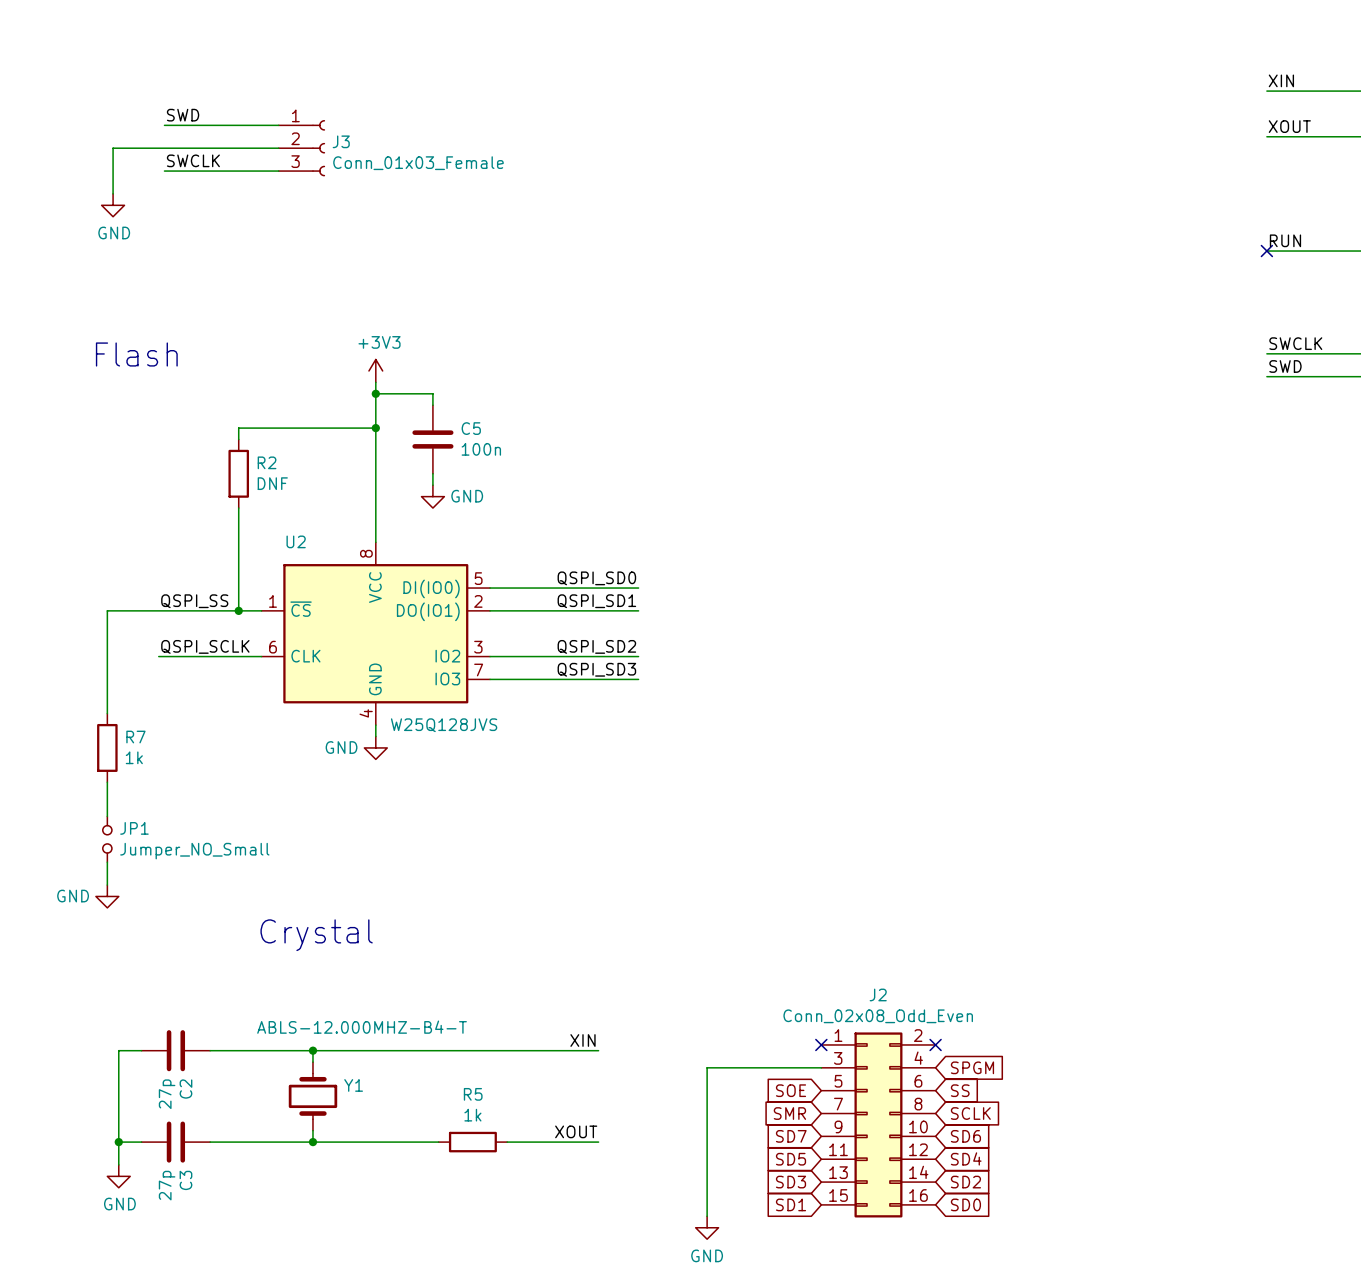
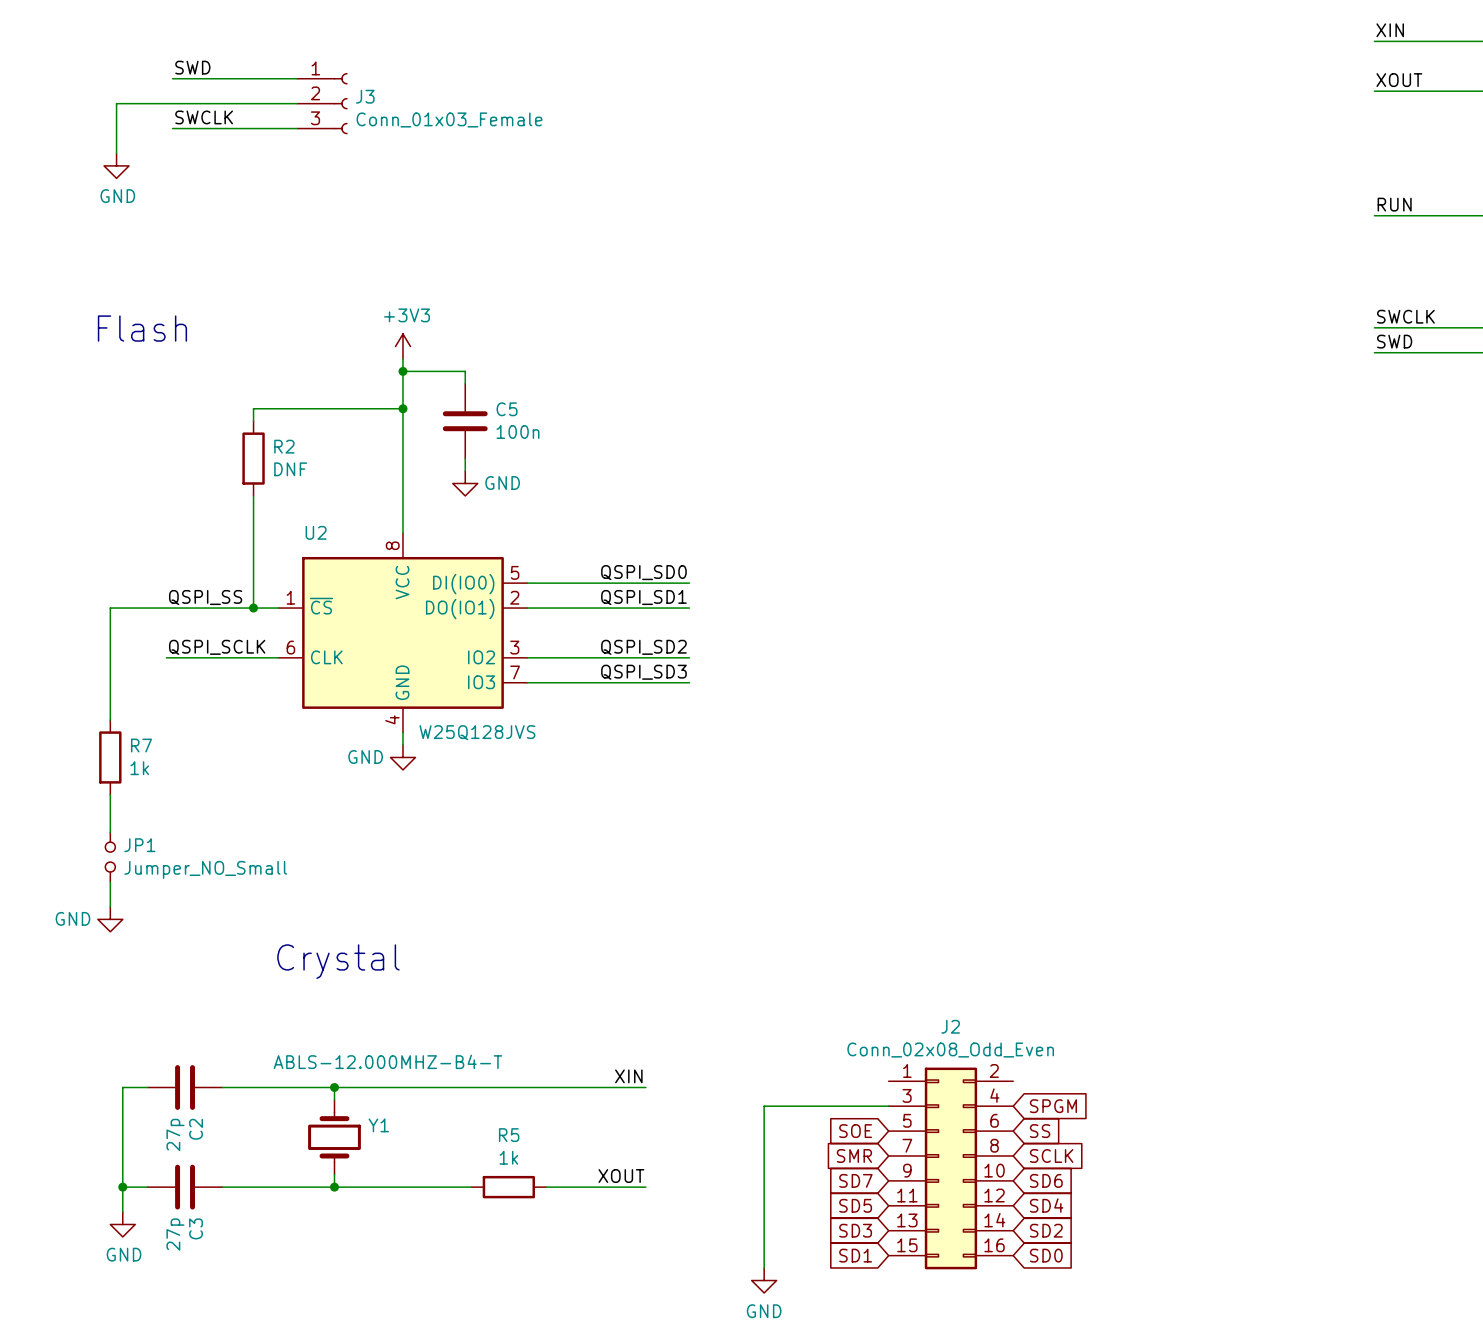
no-connect mark: (1266, 251) -> none
no-connect mark: (821, 1044) -> none
no-connect mark: (935, 1044) -> none

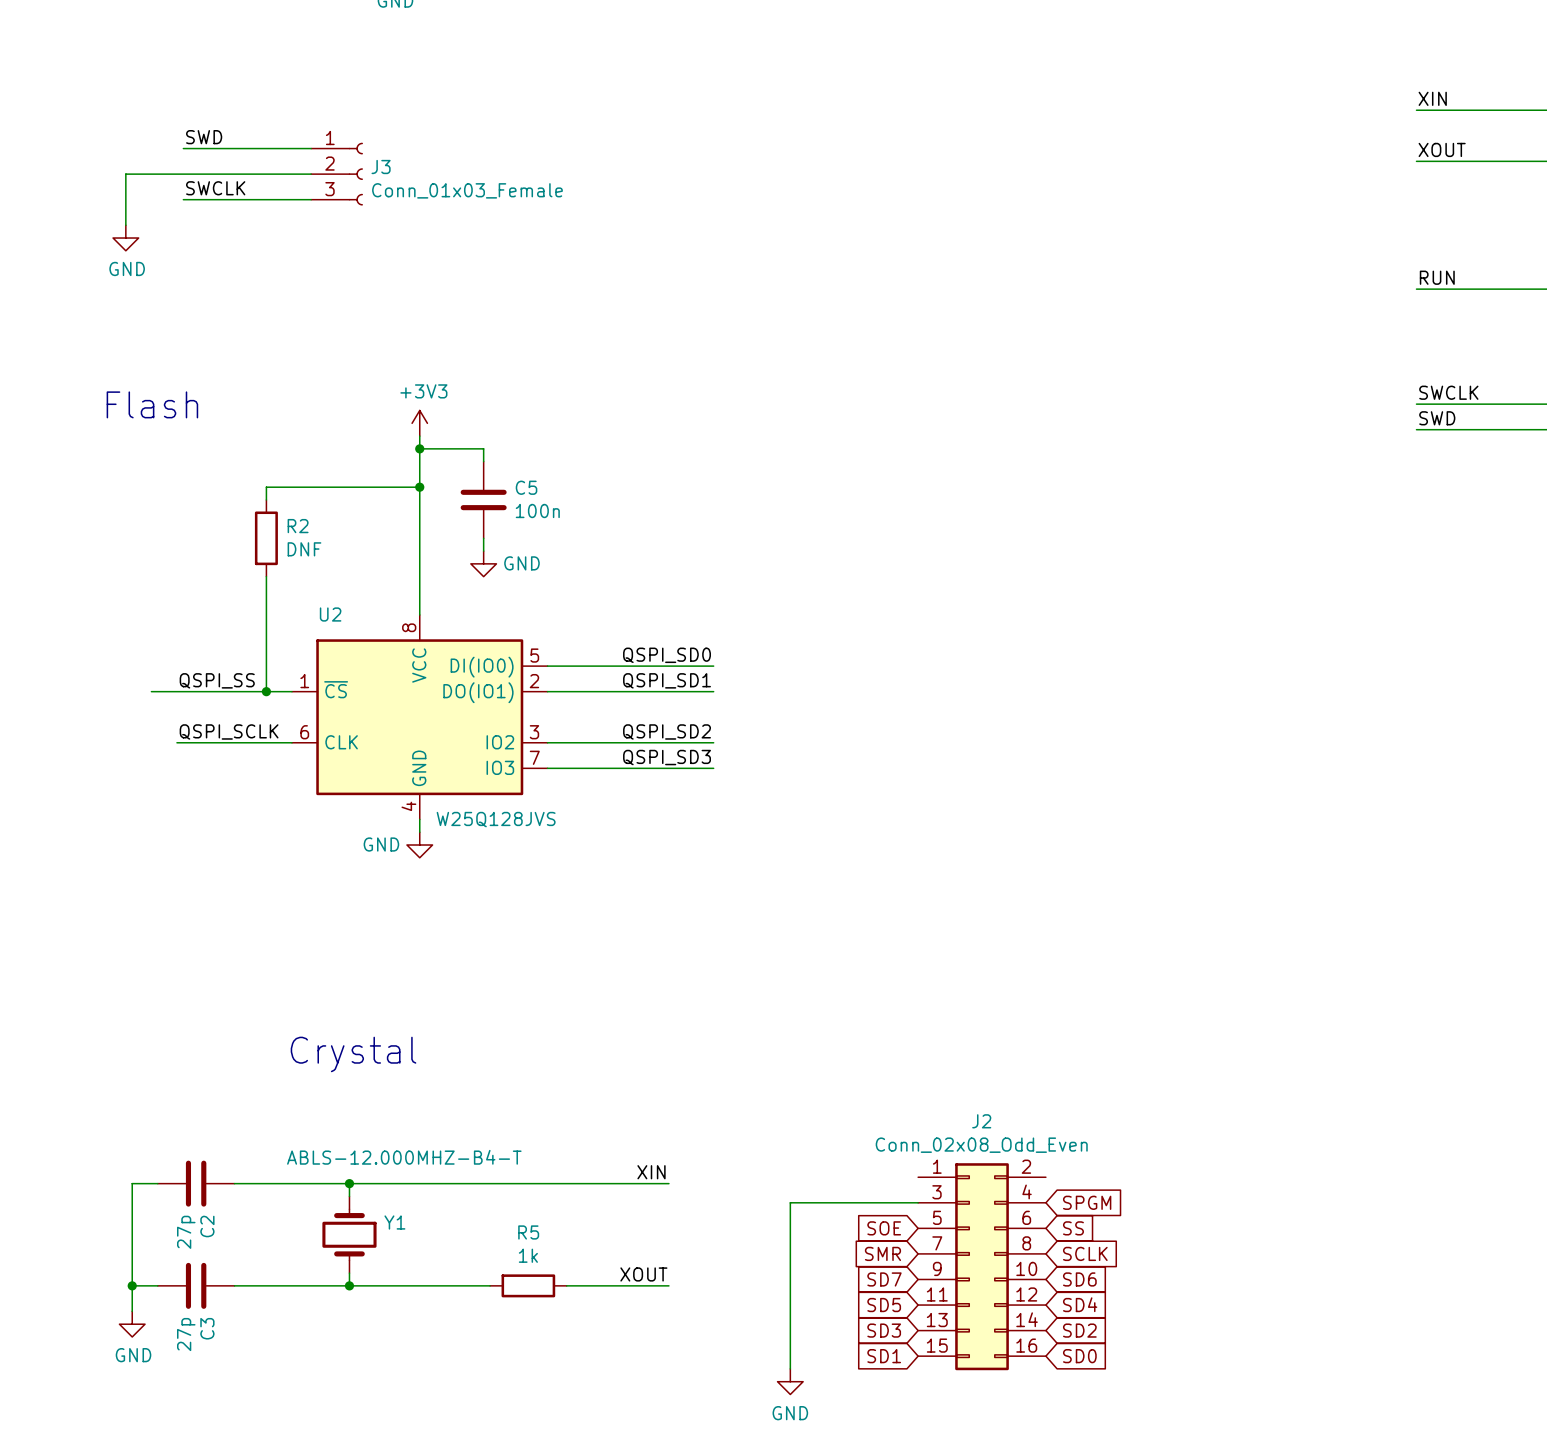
wire: (141, 608) (110, 608) (110, 720) -> none
R7: 1k (110, 757) -> none
wire: (110, 794) (110, 832) -> none
JP1: Jumper_NO_Small (110, 857) -> none
wire: (110, 882) (110, 906) -> none
power symbol: GND (110, 919) -> none

